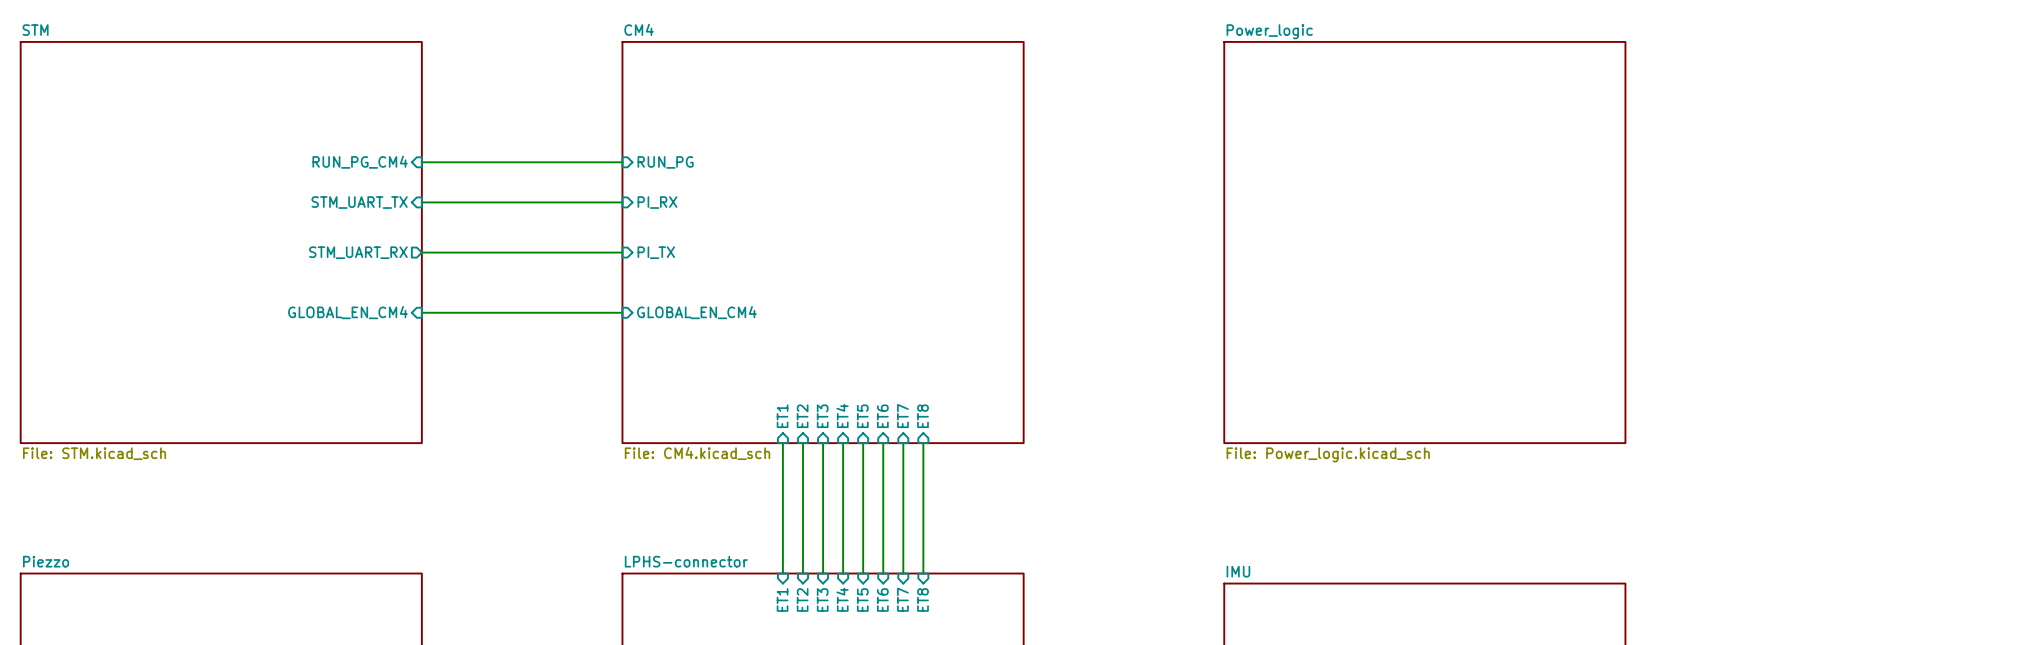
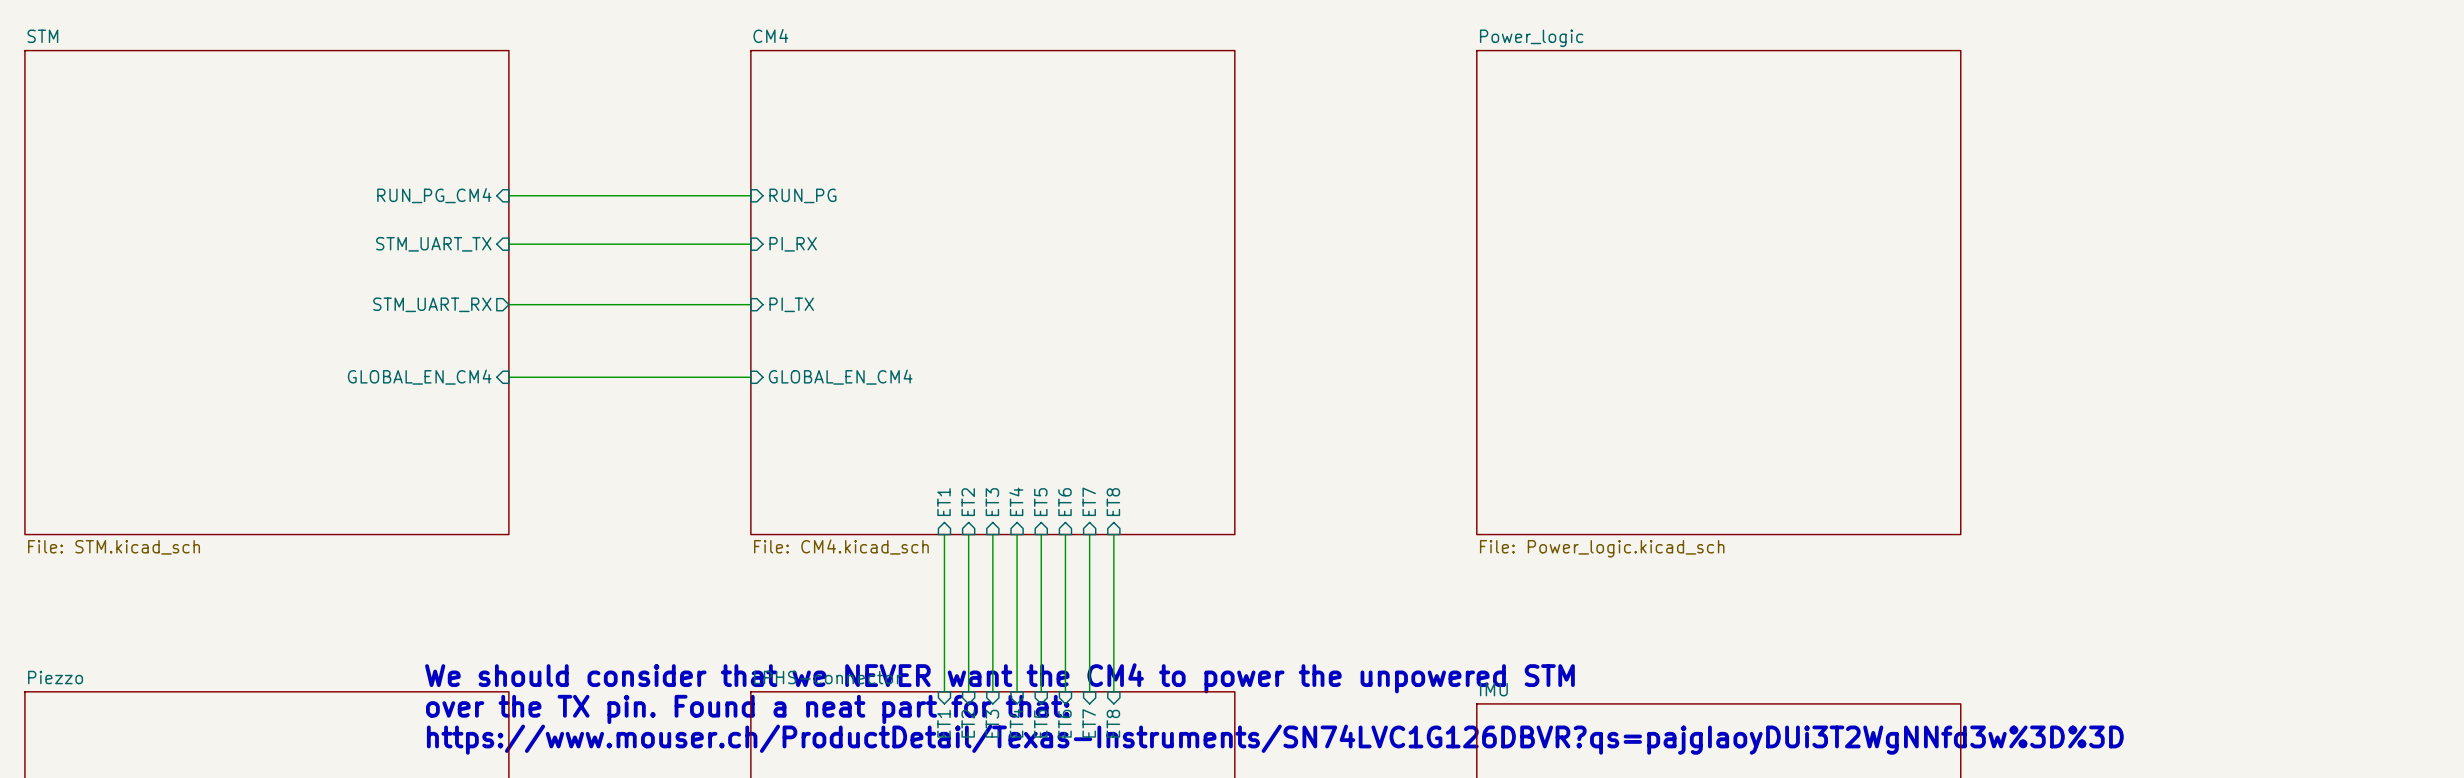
text: none -> We should consider that we NEVER want the CM4 to power the unpowered STM (999, 678)
text: none -> over the TX pin. Found a neat part for that: (747, 709)
text: none -> https://www.mouser.ch/ProductDetail/Texas-Instruments/SN74LVC1G126DBVR?qs=pajgIaoyDUi3T2WgNNfd3w%3D%3D (1275, 739)

